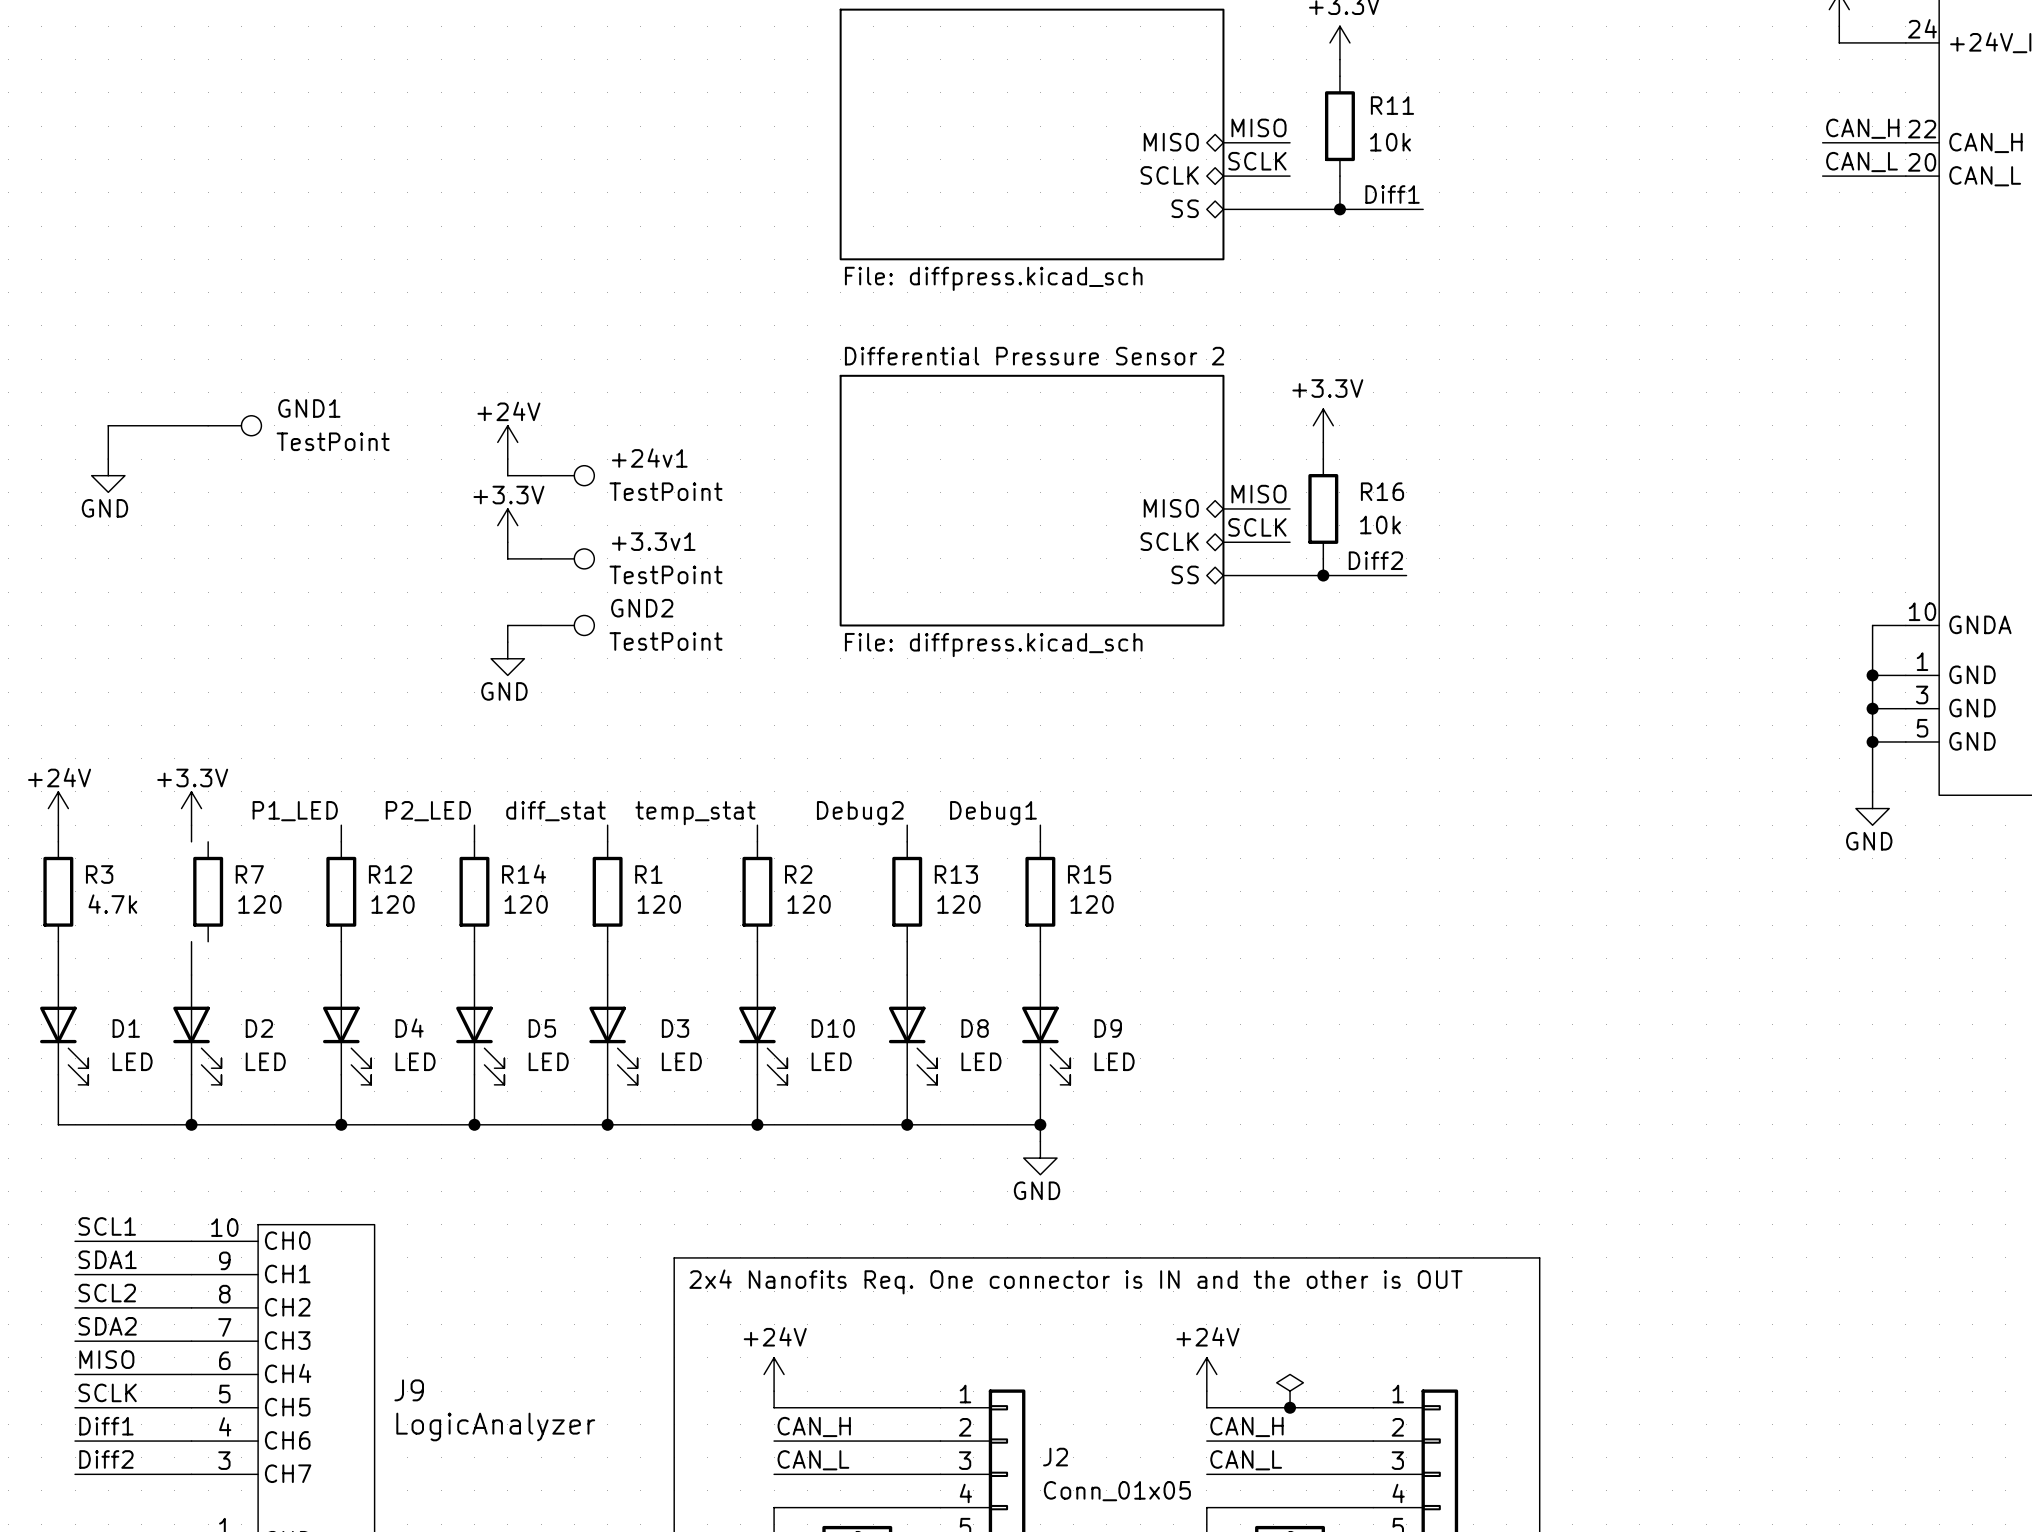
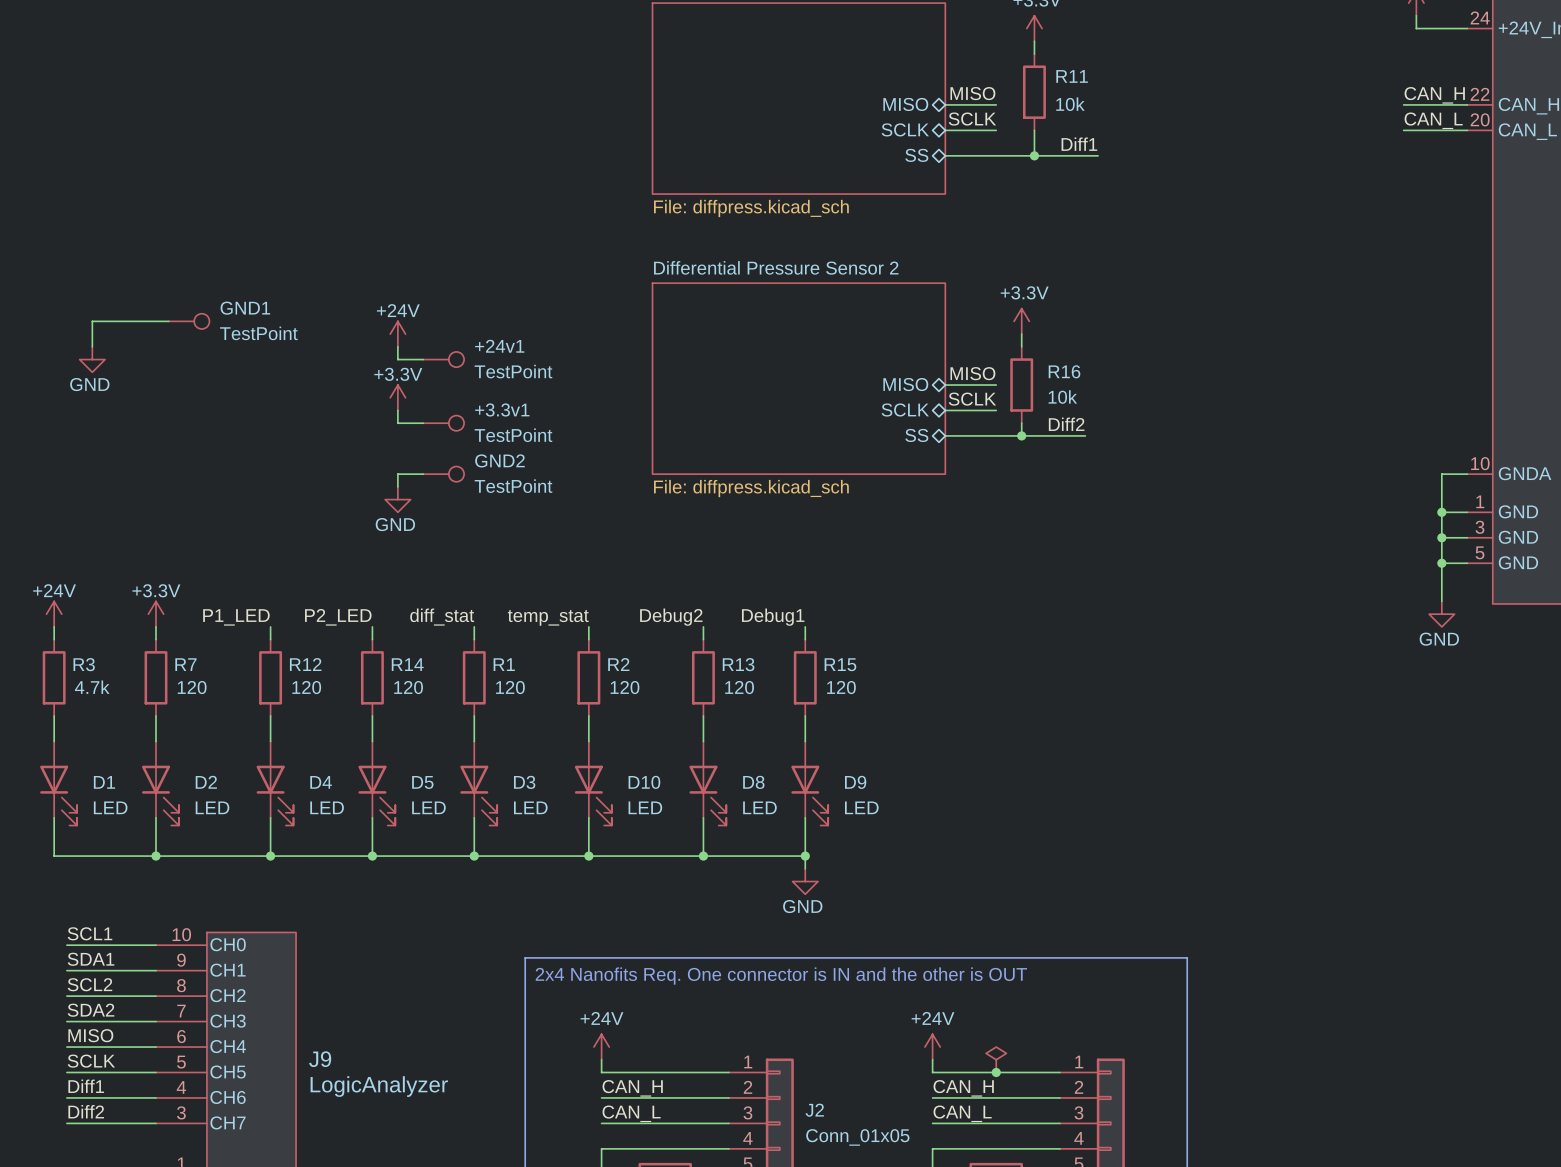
R7 position: (208, 891) -> (156, 677)

